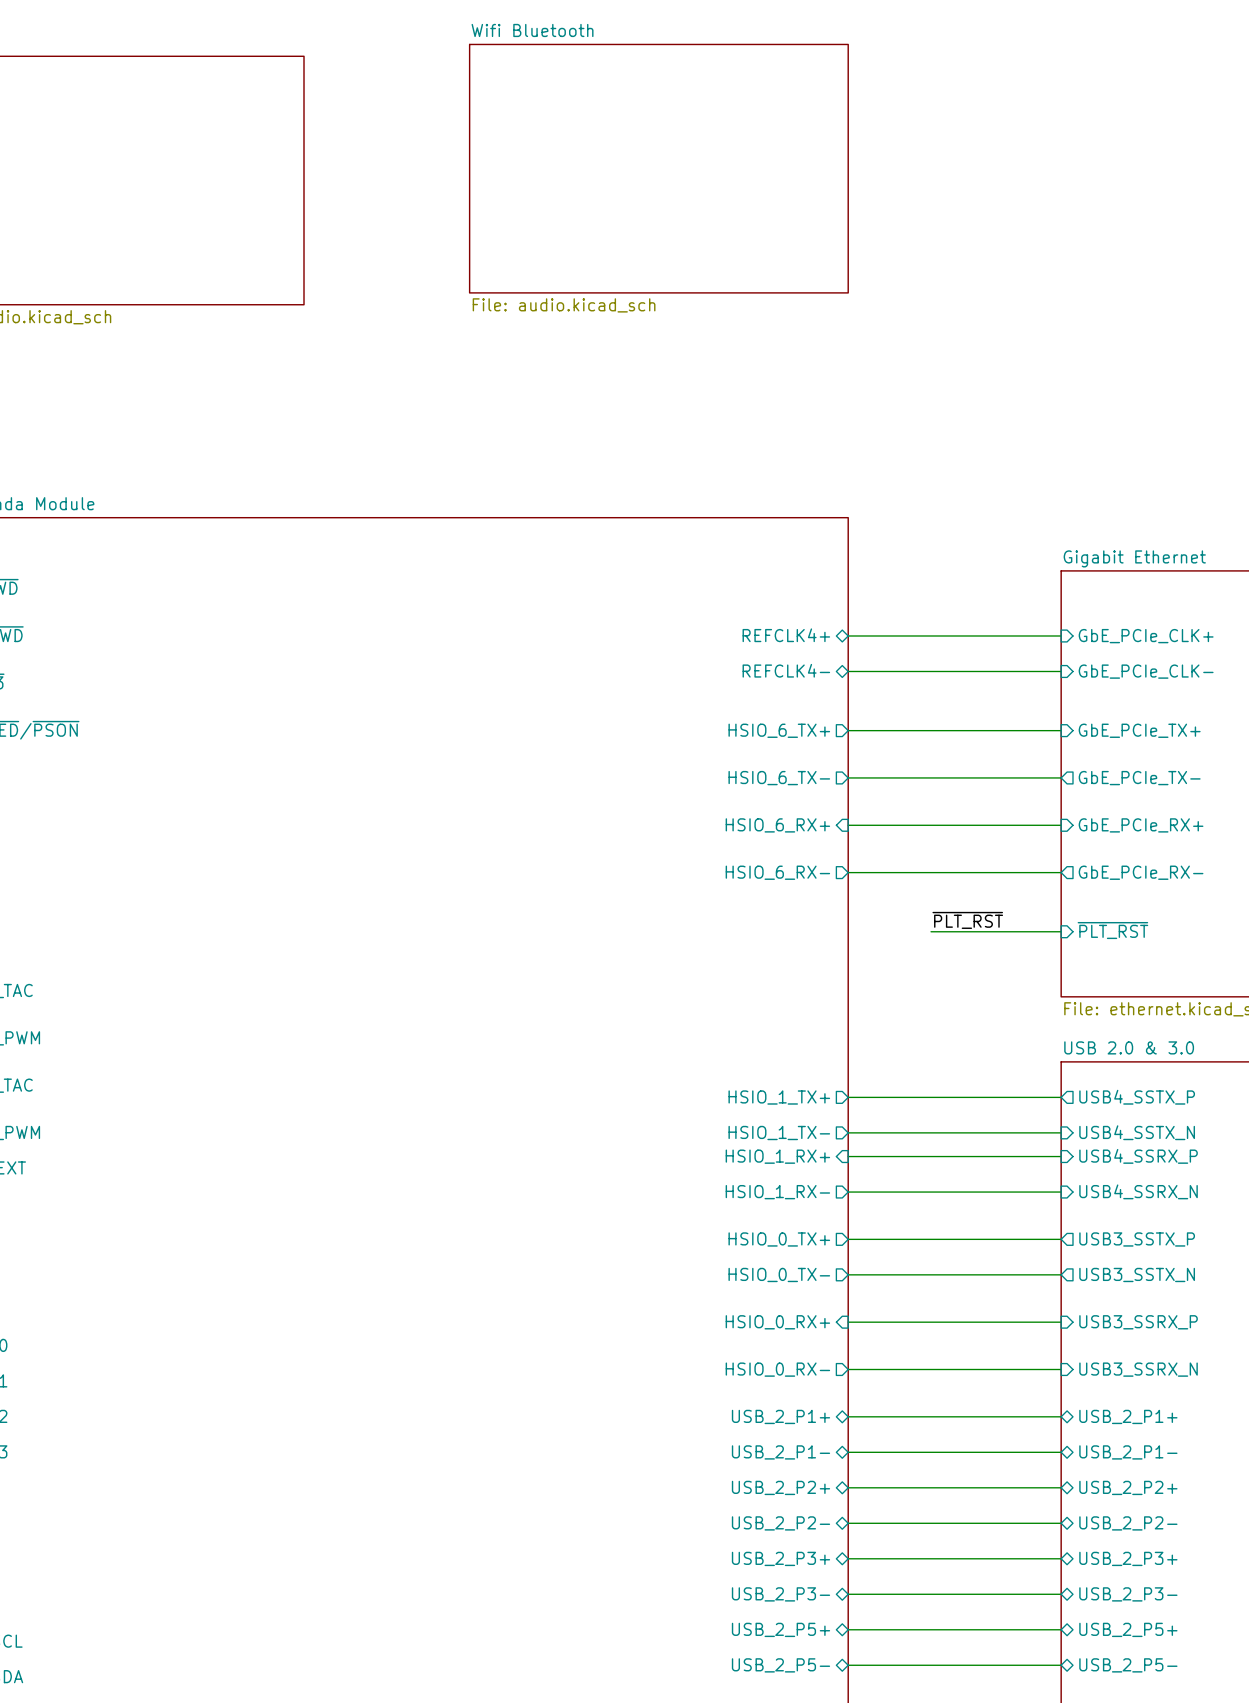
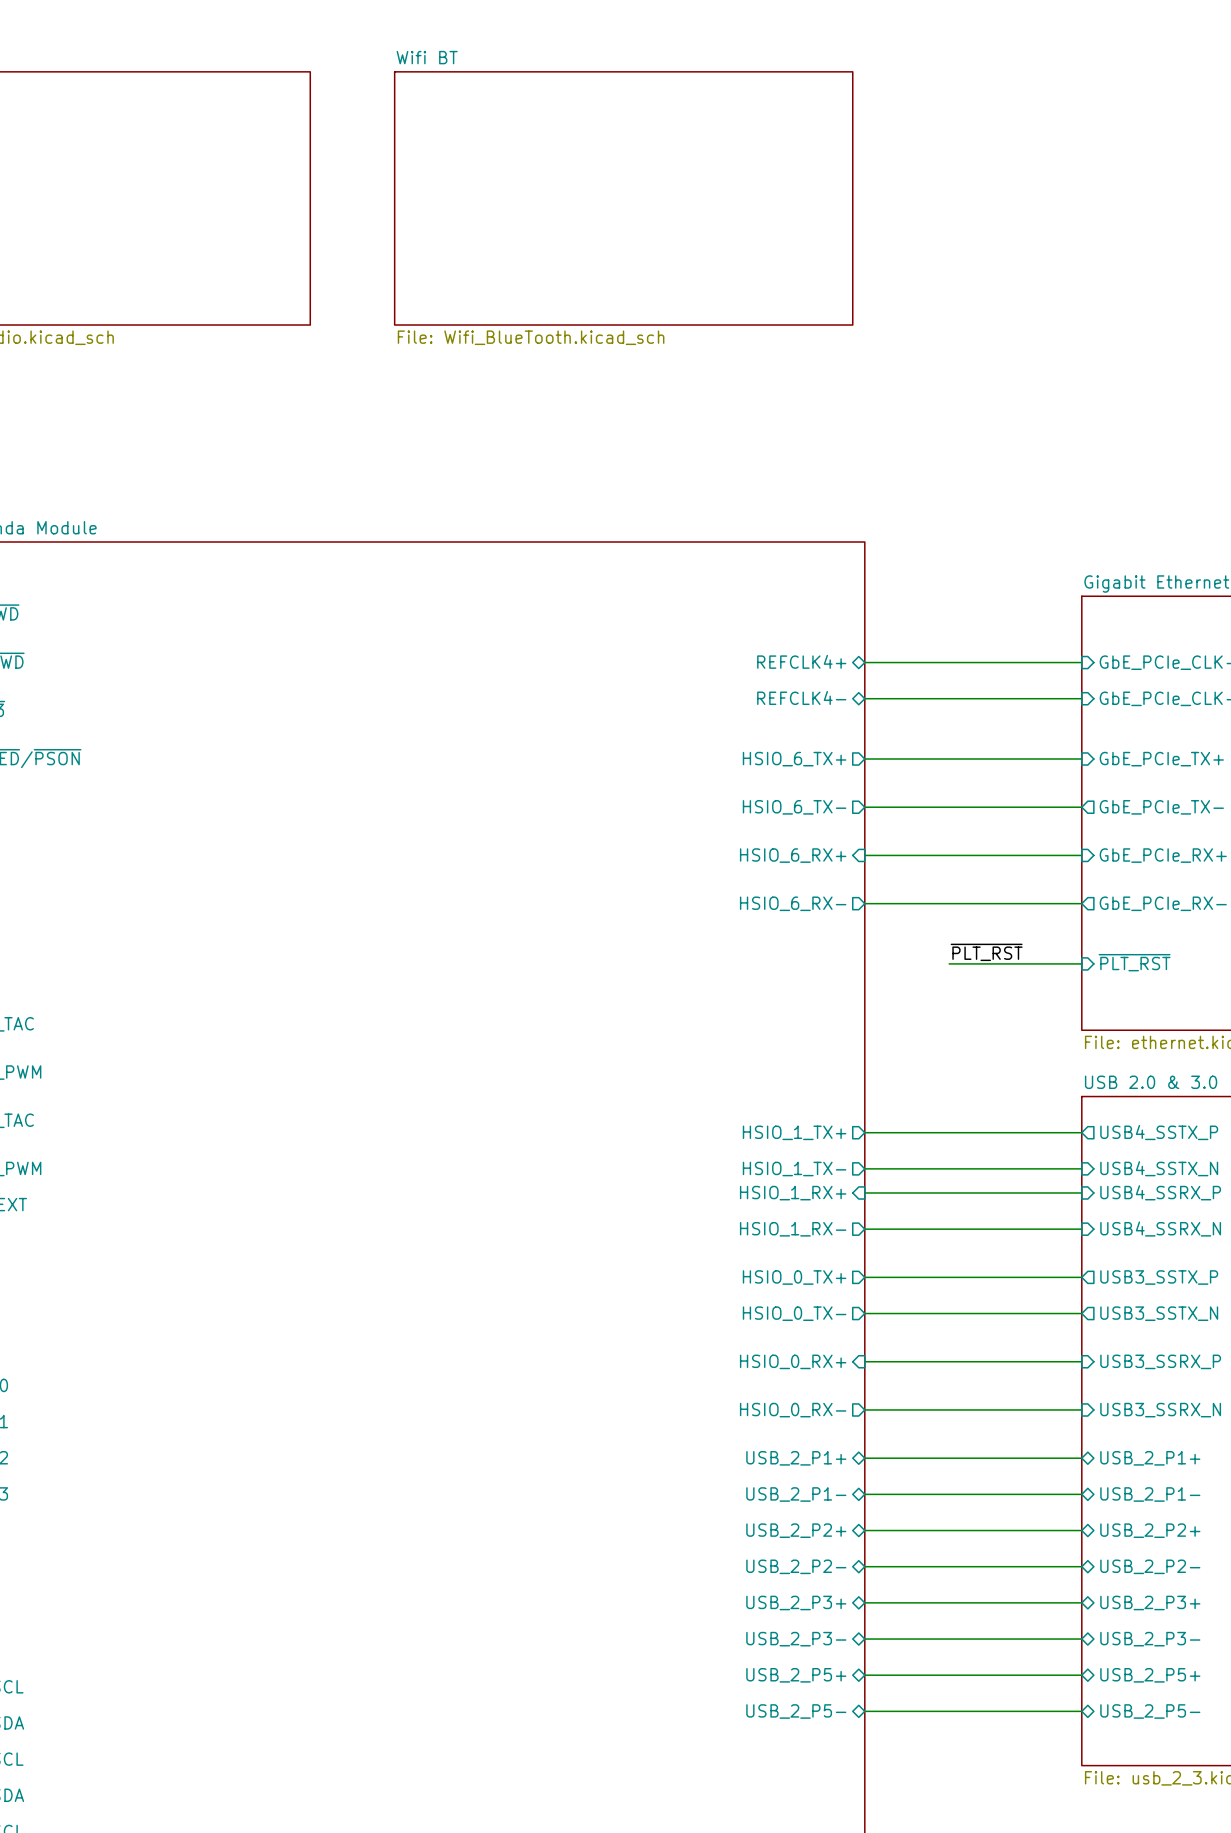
sheet Wifi Bluetooth: File: audio.kicad_sch (658, 168) -> none
sheet Wifi BT: none -> File: Wifi_BlueTooth.kicad_sch (623, 198)

